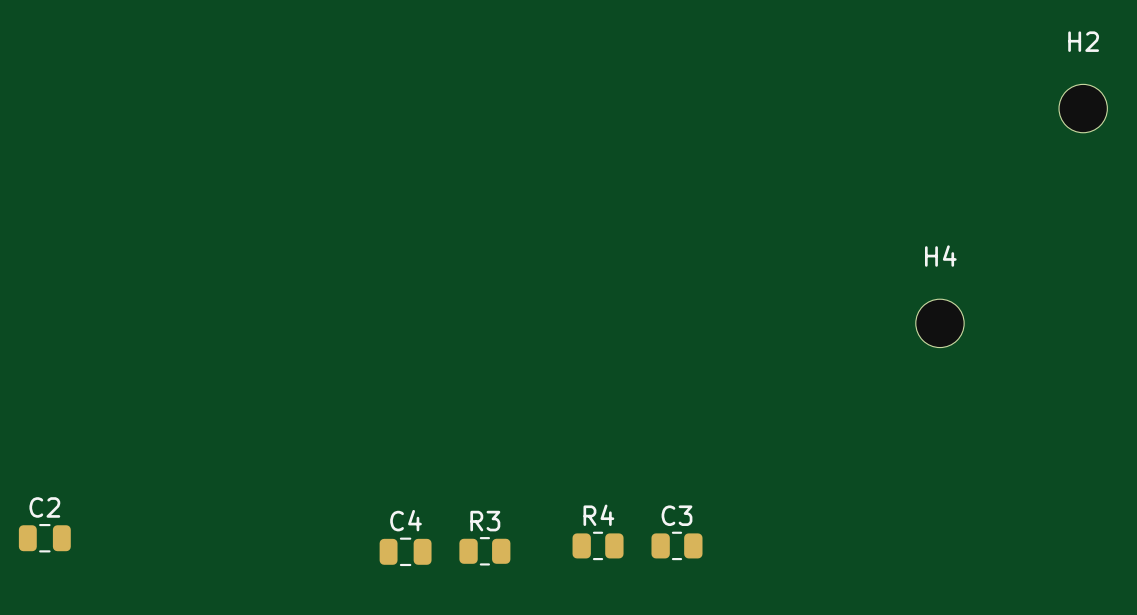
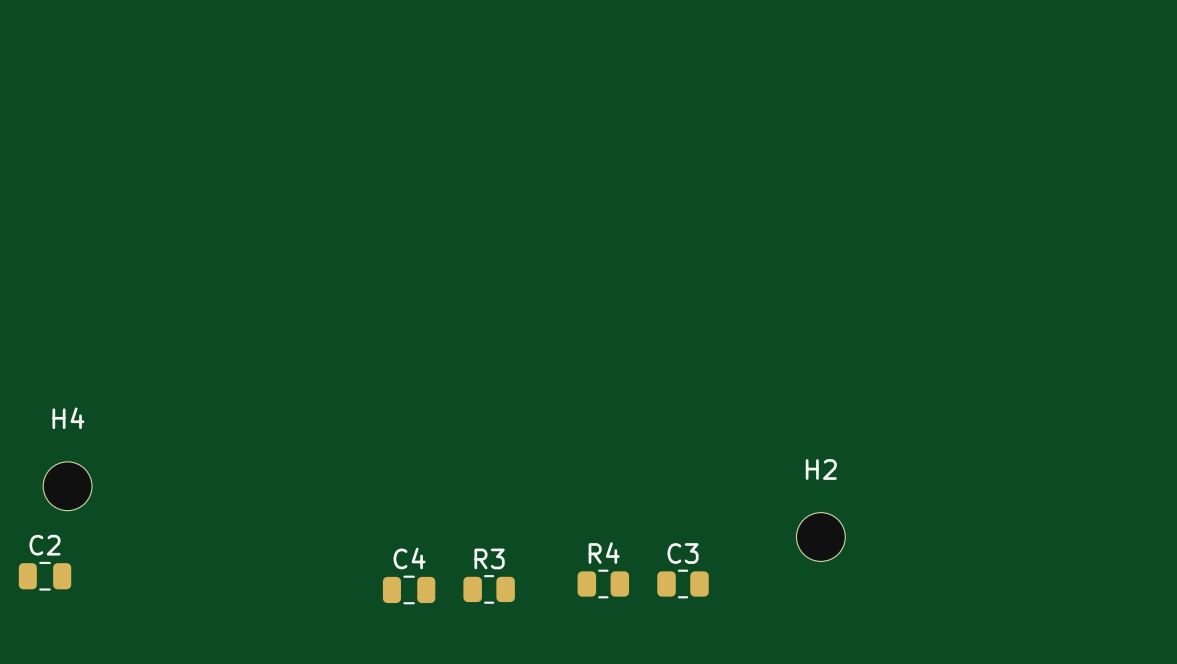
H2 position: (1083, 108) -> (820, 537)
H4 position: (939, 323) -> (67, 486)

